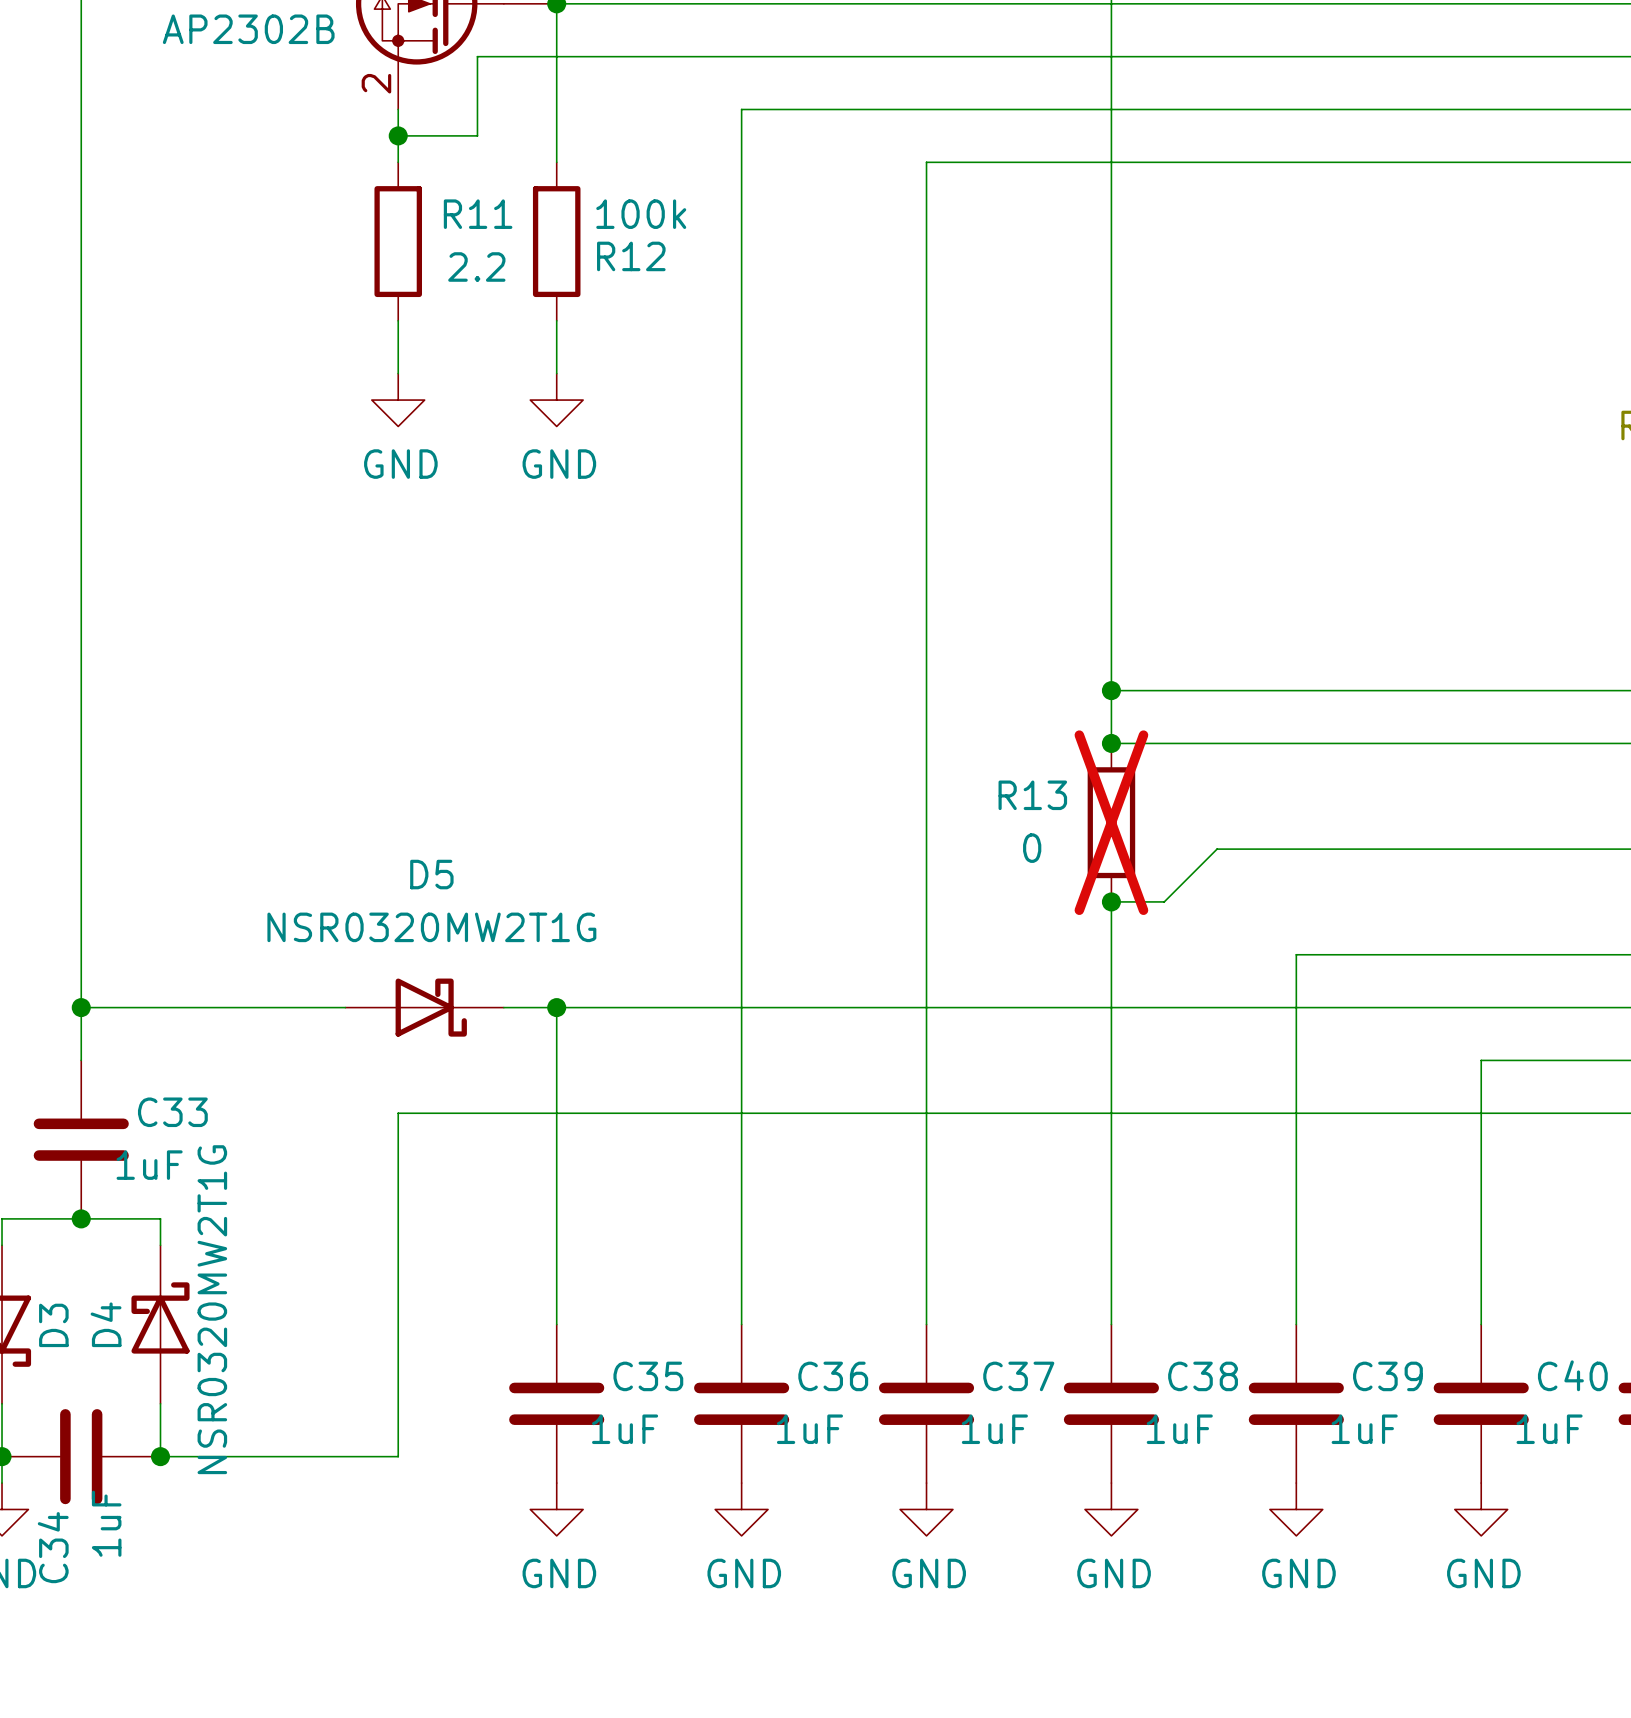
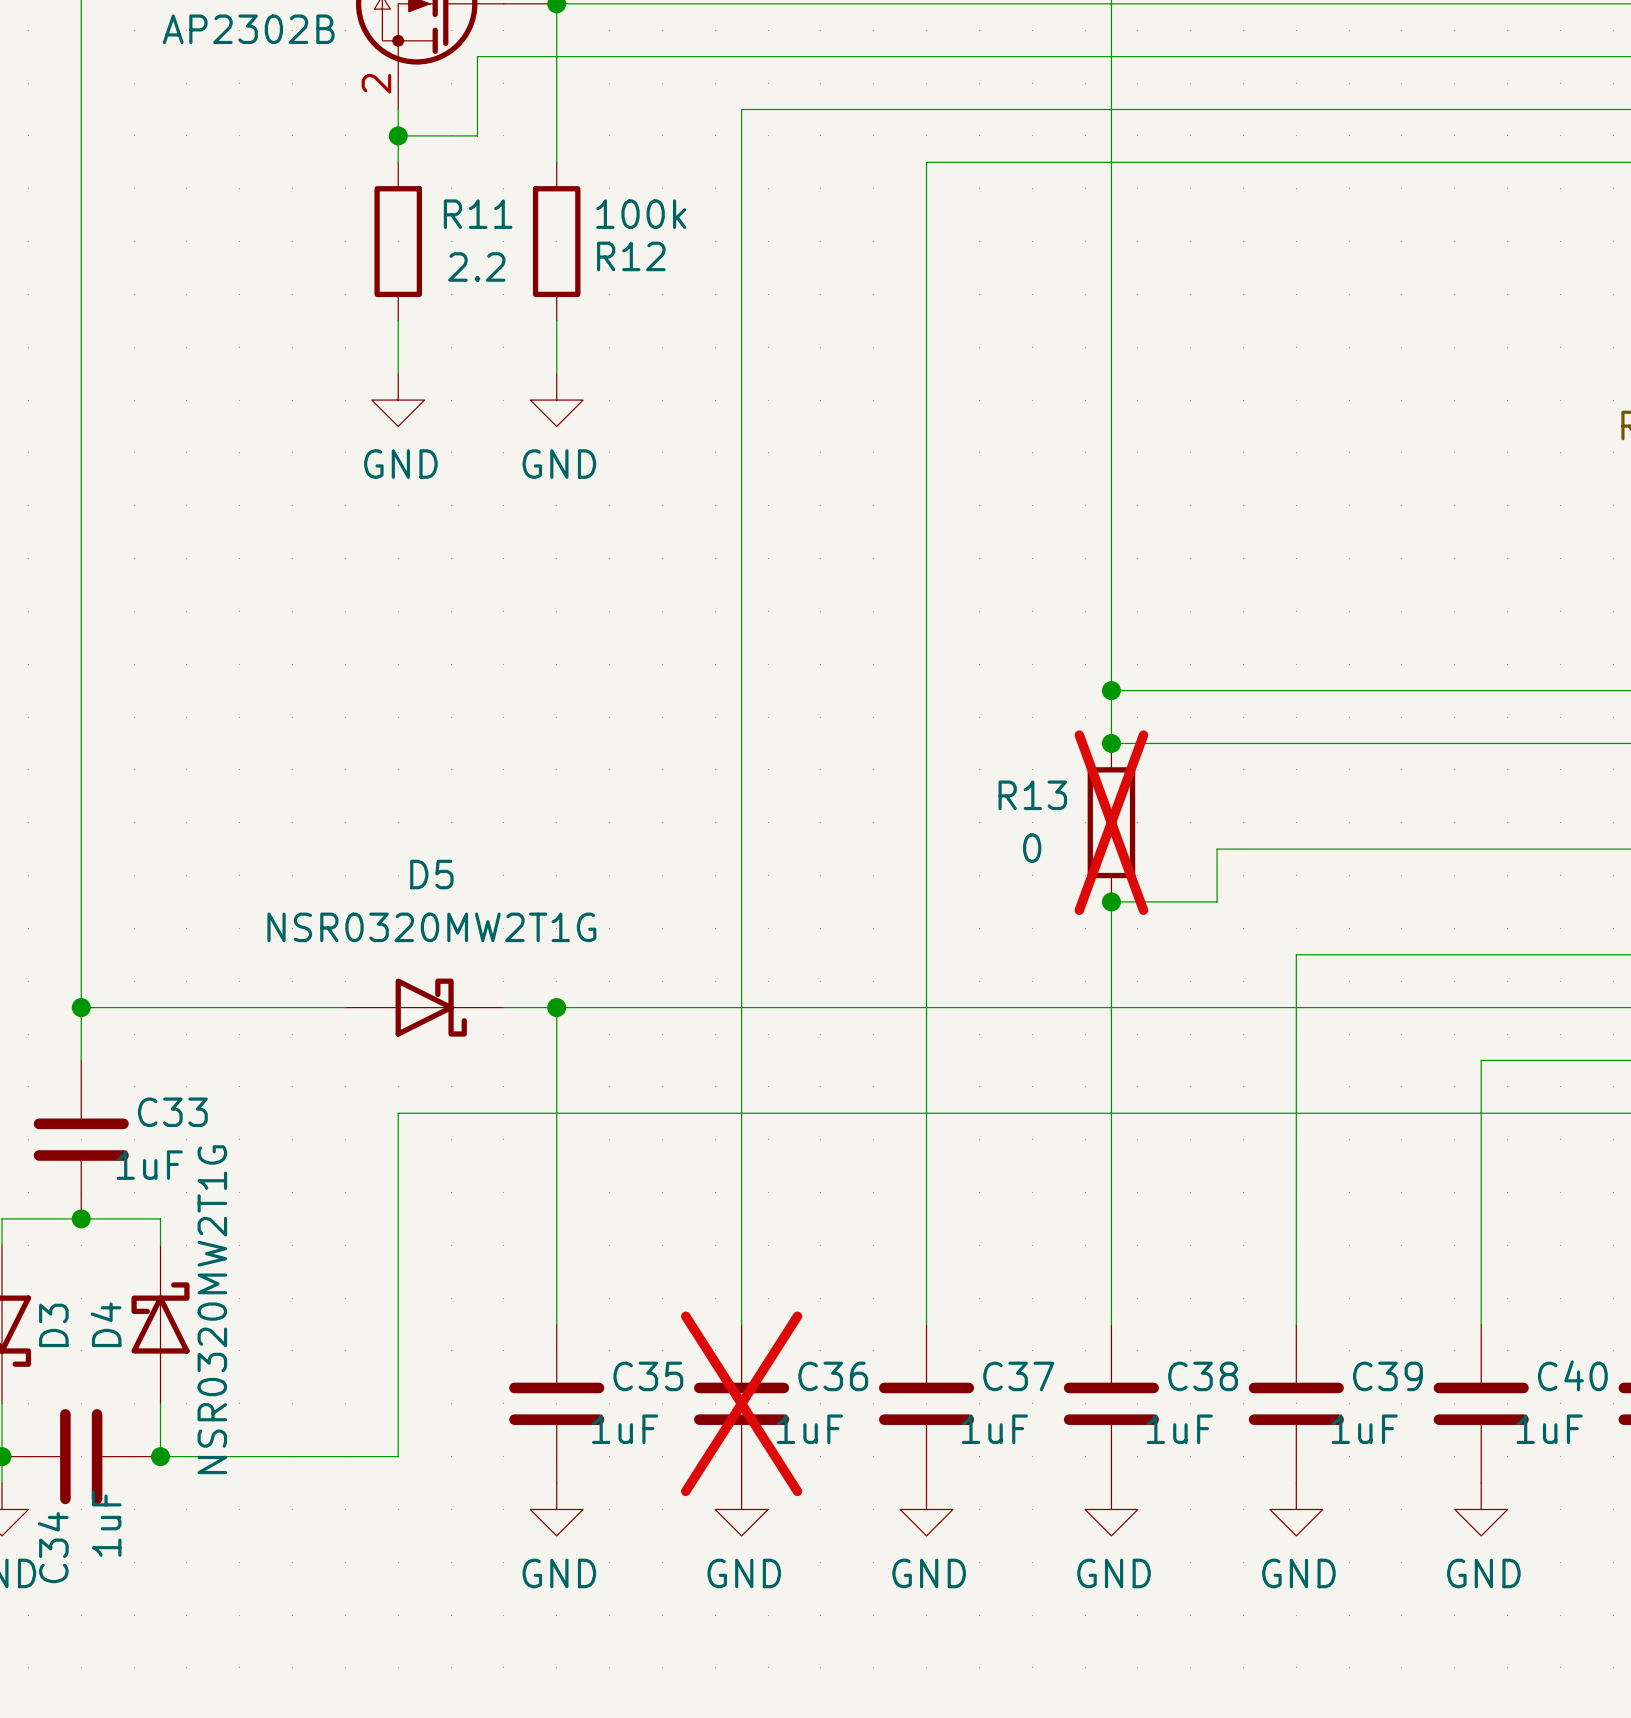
wire: (1217, 849) (1164, 901) -> (1217, 849) (1217, 901) (1164, 901)
C36 do-not-place cross: none -> (741, 1403)

